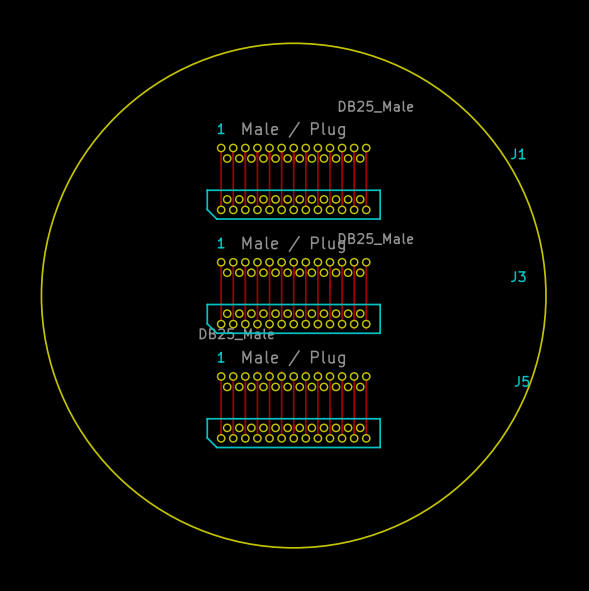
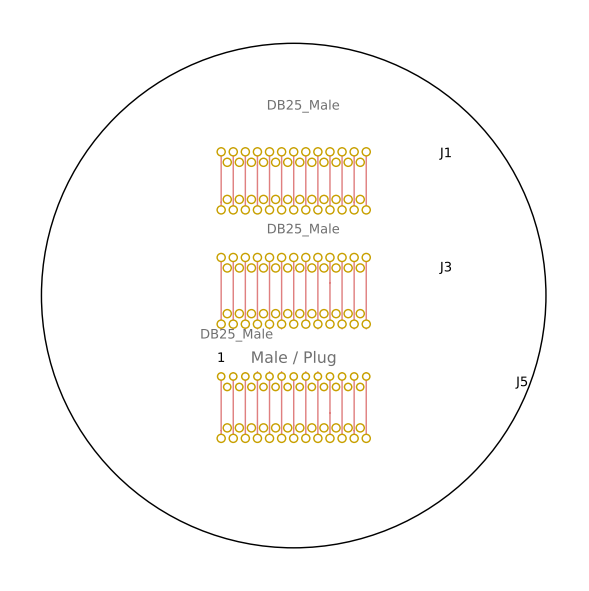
J1 value position: DB25_Male (375, 106) -> DB25_Male (303, 106)
J1 footprint: [216, 143, 371, 163] -> [216, 147, 372, 168]
J1 name position: J1 (518, 153) -> J1 (445, 153)
part footprint: [206, 189, 381, 220] -> [216, 194, 372, 215]
J3 value position: DB25_Male (375, 239) -> DB25_Male (303, 229)
J3 footprint: [216, 257, 371, 278] -> [216, 252, 372, 273]
J3 name position: J3 (518, 276) -> J3 (445, 267)
part footprint: [206, 303, 381, 334] -> [216, 308, 372, 329]
part footprint: [206, 418, 381, 449] -> [216, 423, 372, 444]

